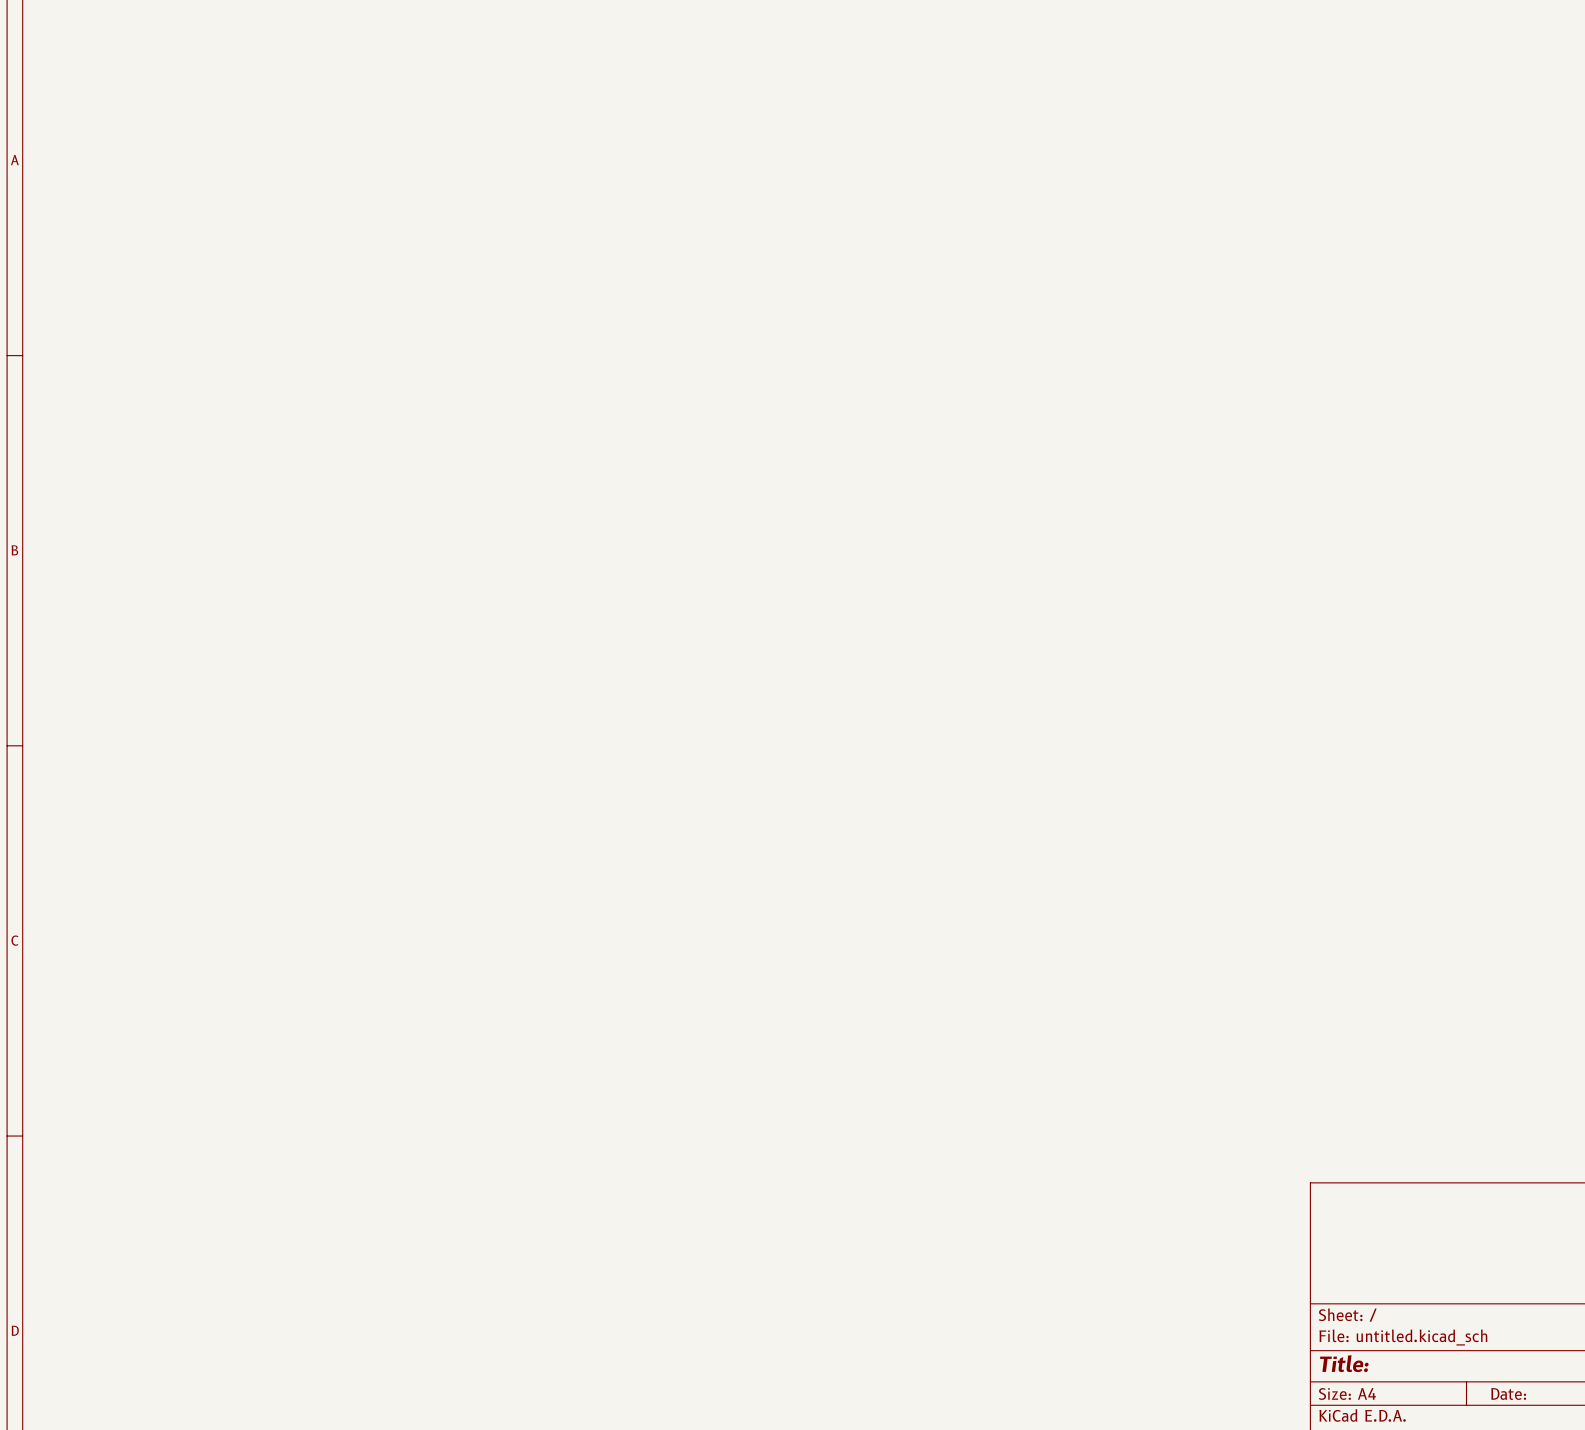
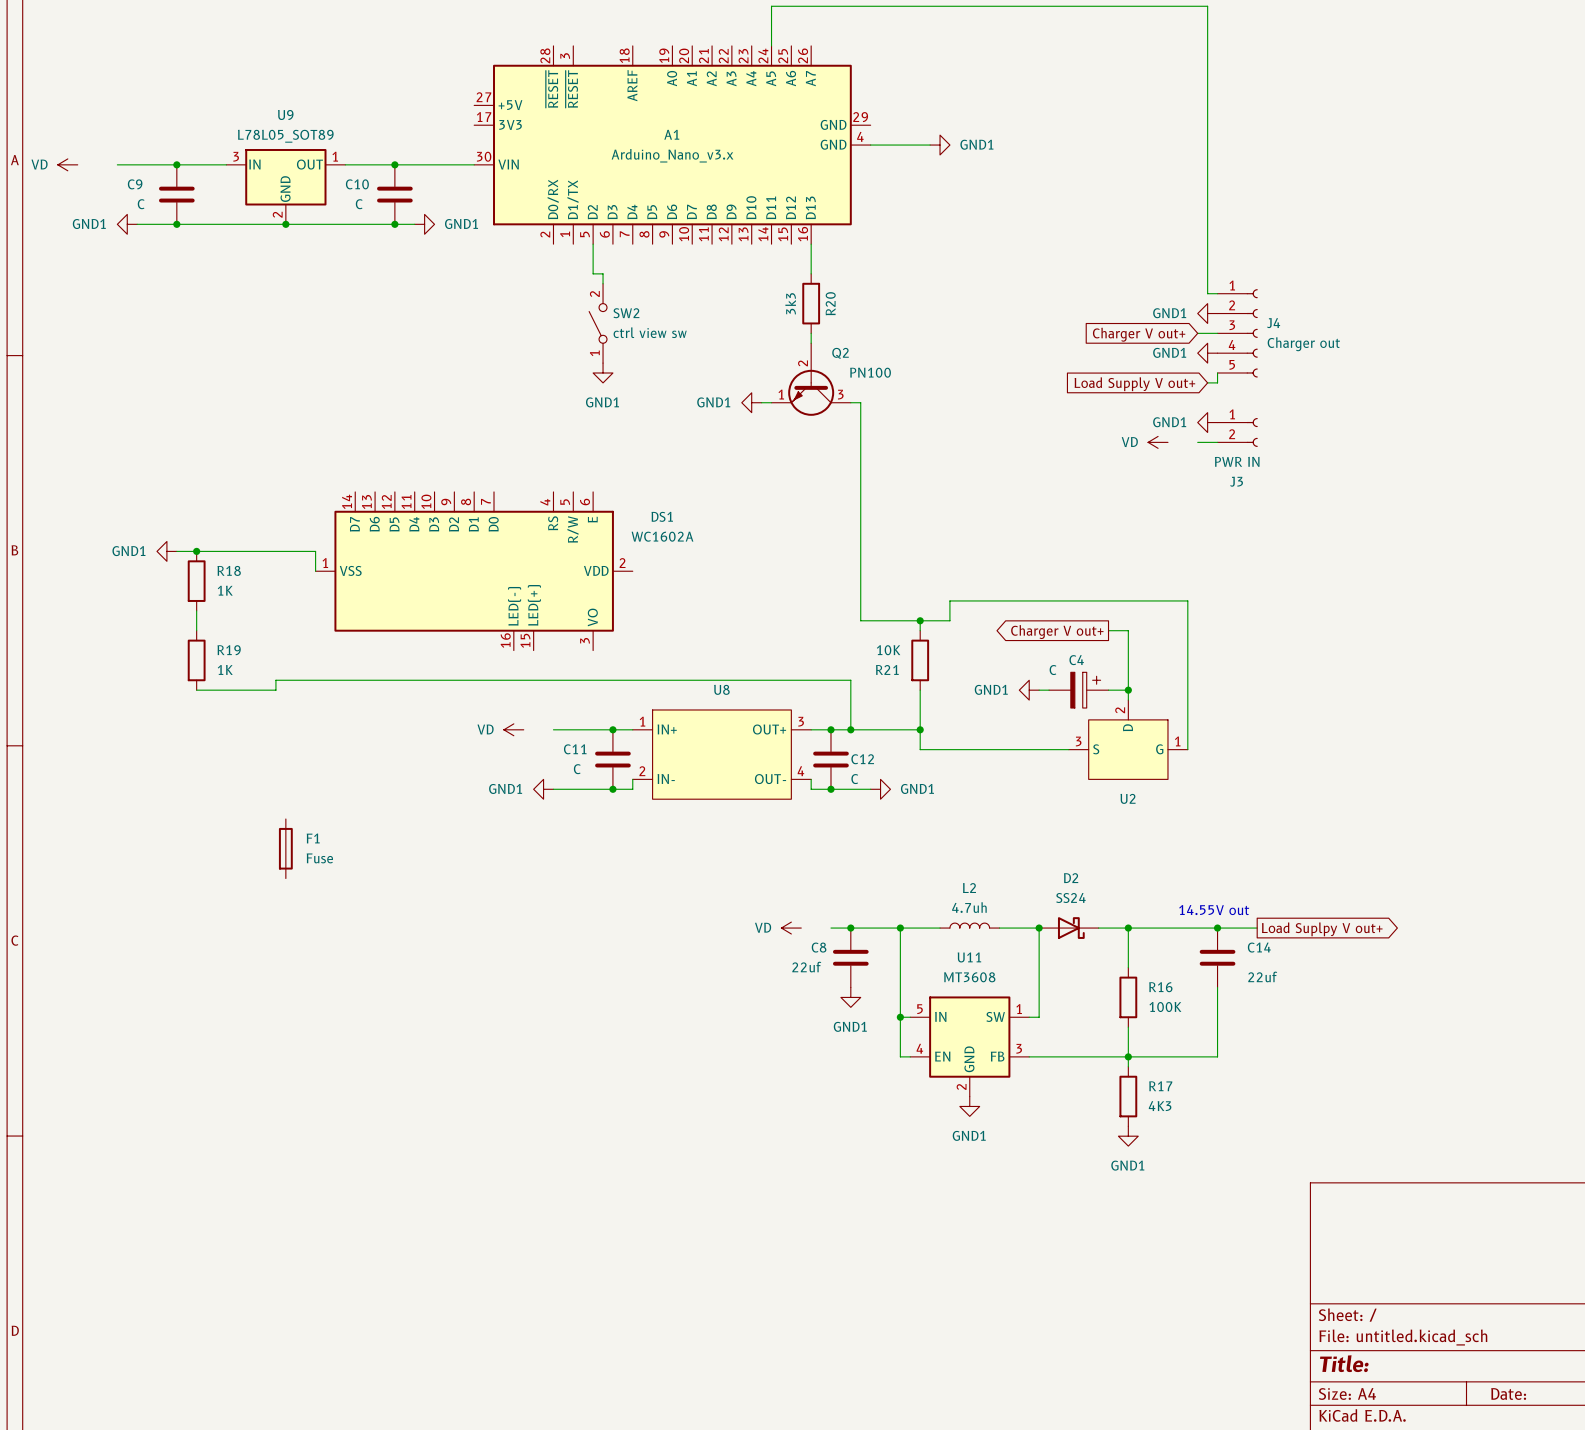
wire: none -> (771, 45) (771, 6) (1207, 6) (1207, 293) (1217, 293)
A1: none -> Arduino_Nano_v3.x (672, 145)
wire: none -> (870, 145) (930, 145)
power symbol: none -> GND1 (940, 145)
power symbol: none -> VD (67, 164)
wire: none -> (117, 164) (226, 164)
junction: none -> (176, 164)
wire: none -> (345, 164) (474, 164)
junction: none -> (394, 164)
U9: none -> L78L05_SOT89 (285, 186)
C9: none -> C (176, 194)
C10: none -> C (394, 194)
power symbol: none -> GND1 (127, 224)
wire: none -> (137, 224) (414, 224)
junction: none -> (176, 224)
junction: none -> (285, 224)
junction: none -> (394, 224)
power symbol: none -> GND1 (424, 224)
wire: none -> (593, 244) (593, 273) (603, 273) (603, 283)
wire: none -> (811, 244) (811, 273)
R20: none -> 3k3 (811, 303)
power symbol: none -> GND1 (1207, 313)
SW2: none -> ctrl view sw (598, 323)
wire: none -> (811, 333) (811, 343)
wire: none -> (1197, 333) (1217, 333)
J4: none -> Charger out (1237, 333)
global label: none -> Charger V out+ (1139, 334)
power symbol: none -> GND1 (1207, 353)
power symbol: none -> GND1 (603, 373)
wire: none -> (1217, 373) (1217, 382) (1207, 382)
Q2: none -> PN100 (811, 379)
global label: none -> Load Supply V out+ (1134, 384)
power symbol: none -> GND1 (751, 402)
wire: none -> (761, 402) (771, 402)
wire: none -> (850, 402) (860, 402) (860, 620) (949, 620) (949, 600) (1187, 600) (1187, 749)
power symbol: none -> GND1 (1207, 422)
J3: none -> PWR IN (1237, 432)
power symbol: none -> VD (1158, 442)
wire: none -> (1197, 442) (1217, 442)
power symbol: none -> GND1 (166, 551)
wire: none -> (176, 551) (315, 551) (315, 571)
junction: none -> (196, 551)
DS1: none -> WC1602A (474, 571)
R18: none -> 1K (196, 581)
wire: none -> (196, 610) (196, 630)
wire: none -> (920, 620) (920, 630)
junction: none -> (920, 620)
wire: none -> (1108, 630) (1128, 630) (1128, 700)
global label: none -> Charger V out+ (1057, 632)
R19: none -> 1K (196, 660)
R21: none -> 10K (920, 660)
wire: none -> (196, 690) (275, 690) (275, 680) (850, 680) (850, 729)
wire: none -> (920, 690) (920, 749) (1068, 749)
power symbol: none -> GND1 (1029, 690)
wire: none -> (1039, 690) (1049, 690)
C4: none -> C (1078, 690)
wire: none -> (1108, 690) (1128, 690)
junction: none -> (1128, 690)
power symbol: none -> VD (513, 729)
wire: none -> (553, 729) (632, 729)
junction: none -> (612, 729)
wire: none -> (811, 729) (920, 729)
junction: none -> (830, 729)
junction: none -> (850, 729)
junction: none -> (920, 729)
U2: none -> (1128, 739)
U8: none -> (721, 754)
C11: none -> C (612, 759)
C12: none -> C (830, 759)
wire: none -> (632, 779) (632, 789) (553, 789)
wire: none -> (811, 779) (811, 789) (870, 789)
power symbol: none -> GND1 (543, 789)
junction: none -> (612, 789)
junction: none -> (830, 789)
power symbol: none -> GND1 (880, 789)
F1: none -> Fuse (285, 848)
text: none -> 14.55V out (1214, 910)
L2: none -> 4.7uh (969, 925)
power symbol: none -> VD (791, 928)
wire: none -> (830, 928) (940, 928)
junction: none -> (850, 928)
wire: none -> (900, 928) (900, 1056) (910, 1056)
junction: none -> (900, 928)
wire: none -> (999, 928) (1039, 928) (1039, 1017) (1029, 1017)
junction: none -> (1039, 928)
D2: none -> SS24 (1068, 928)
wire: none -> (1098, 928) (1257, 928)
wire: none -> (1128, 928) (1128, 967)
junction: none -> (1128, 928)
junction: none -> (1217, 928)
global label: none -> Load Suplpy V out+ (1322, 929)
C8: none -> 22uf (850, 957)
C14: none -> 22uf (1217, 957)
wire: none -> (1217, 987) (1217, 1056) (1029, 1056)
power symbol: none -> GND1 (850, 997)
R16: none -> 100K (1128, 997)
wire: none -> (900, 1017) (910, 1017)
junction: none -> (900, 1017)
wire: none -> (1128, 1027) (1128, 1066)
U11: none -> MT3608 (969, 1046)
junction: none -> (1128, 1056)
R17: none -> 4K3 (1128, 1096)
power symbol: none -> GND1 (969, 1106)
power symbol: none -> GND1 (1128, 1136)

